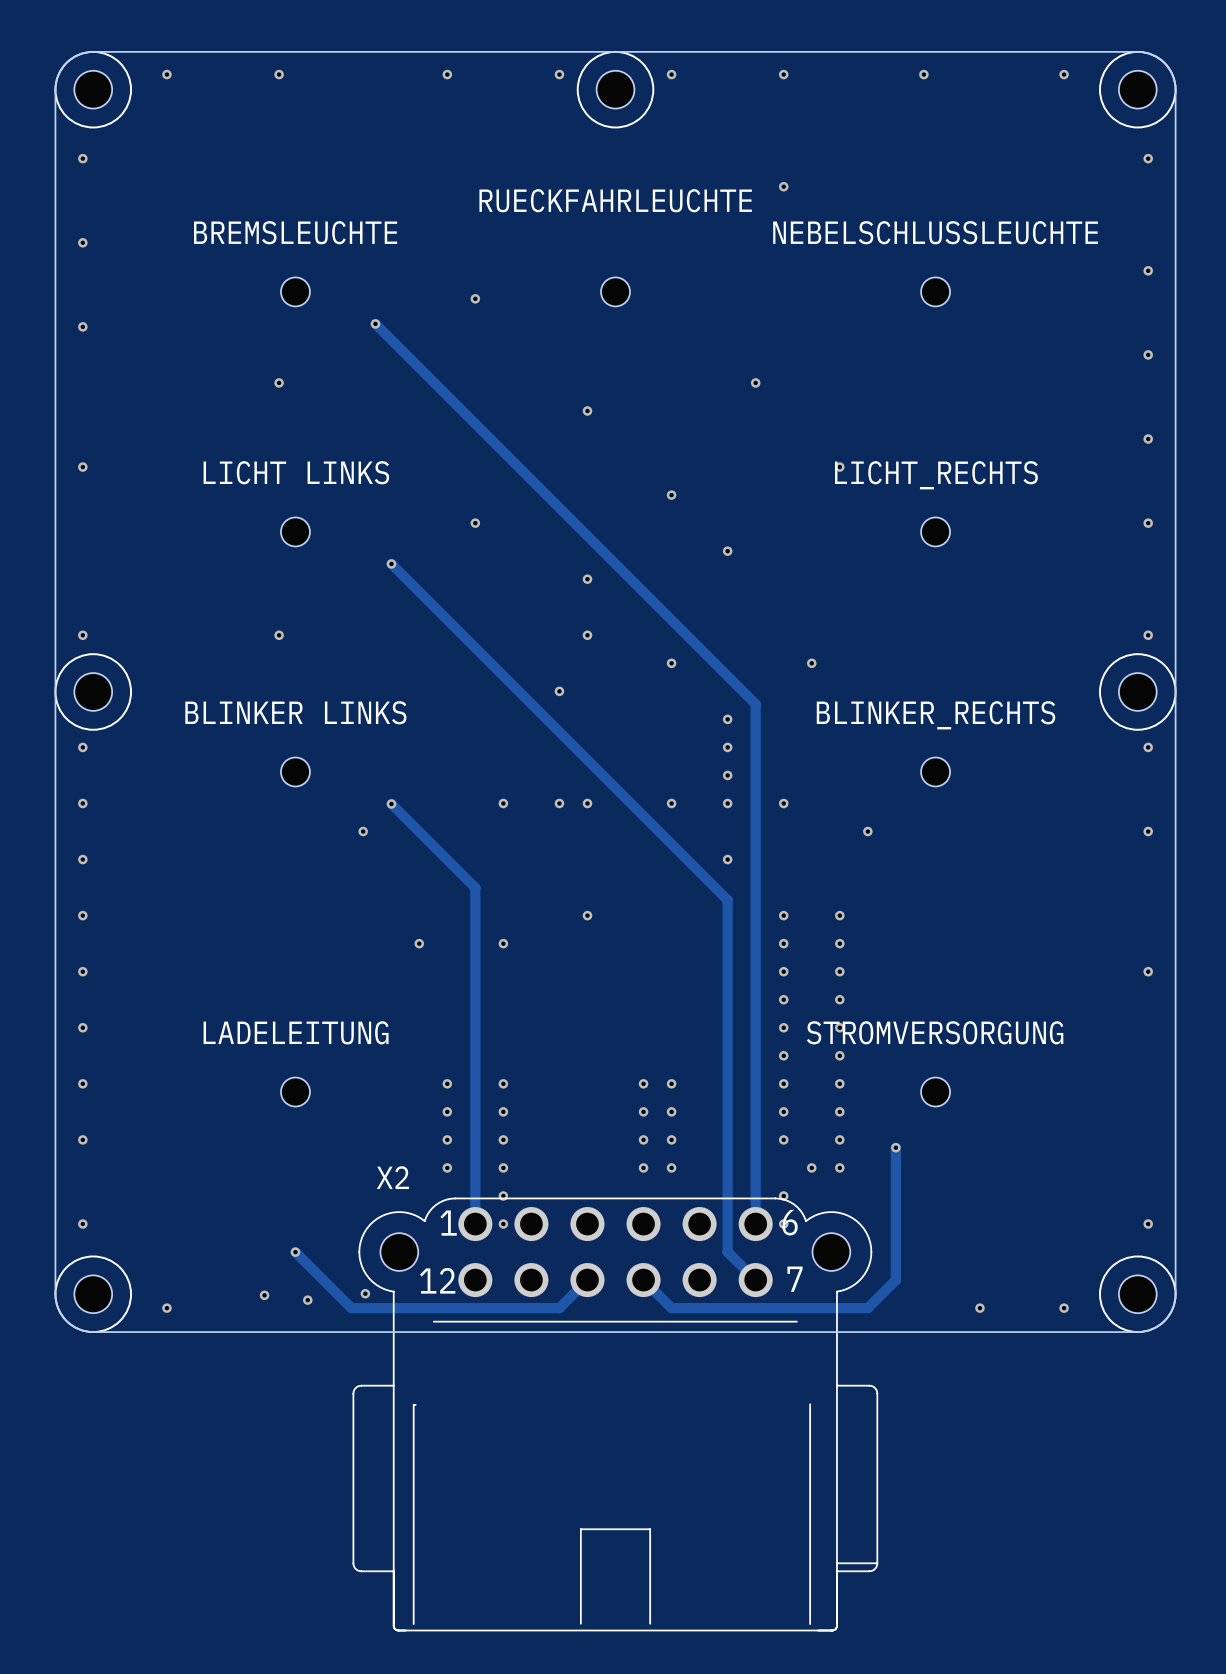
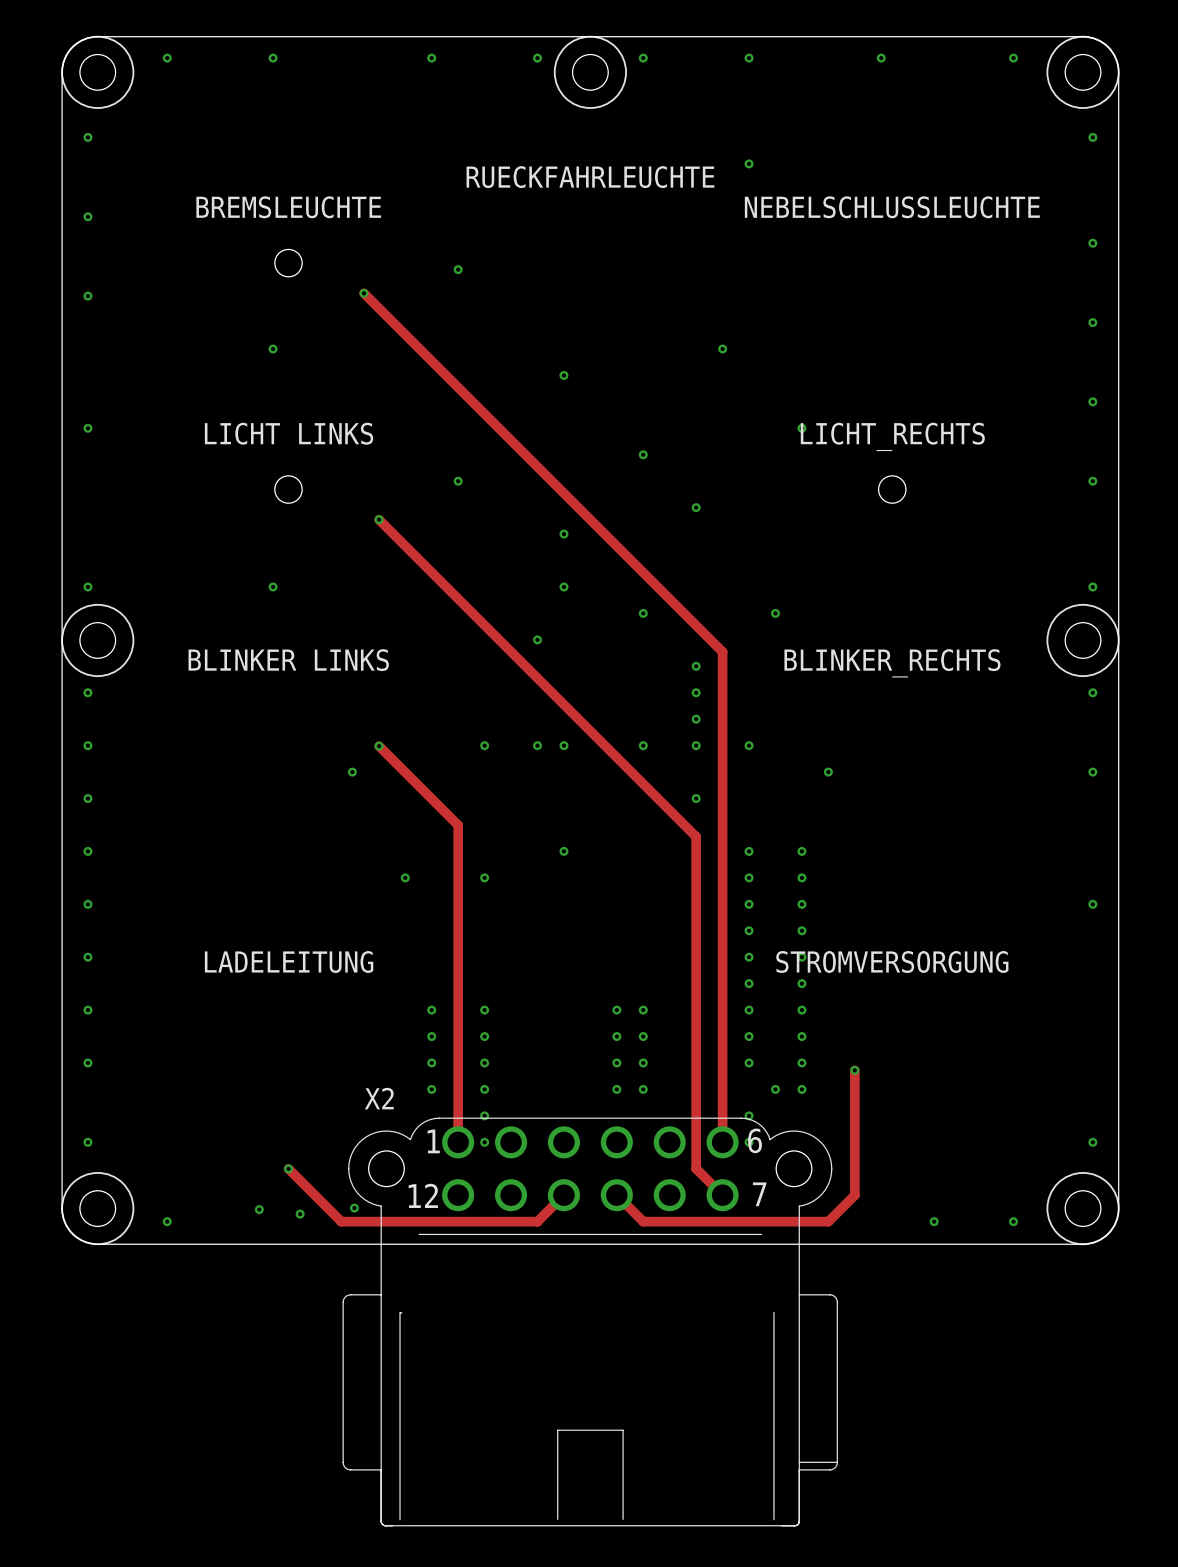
part: (615, 291) -> none
part: (935, 291) -> none
part: (295, 771) -> none
part: (935, 771) -> none
part: (295, 1092) -> none
part: (935, 1092) -> none

